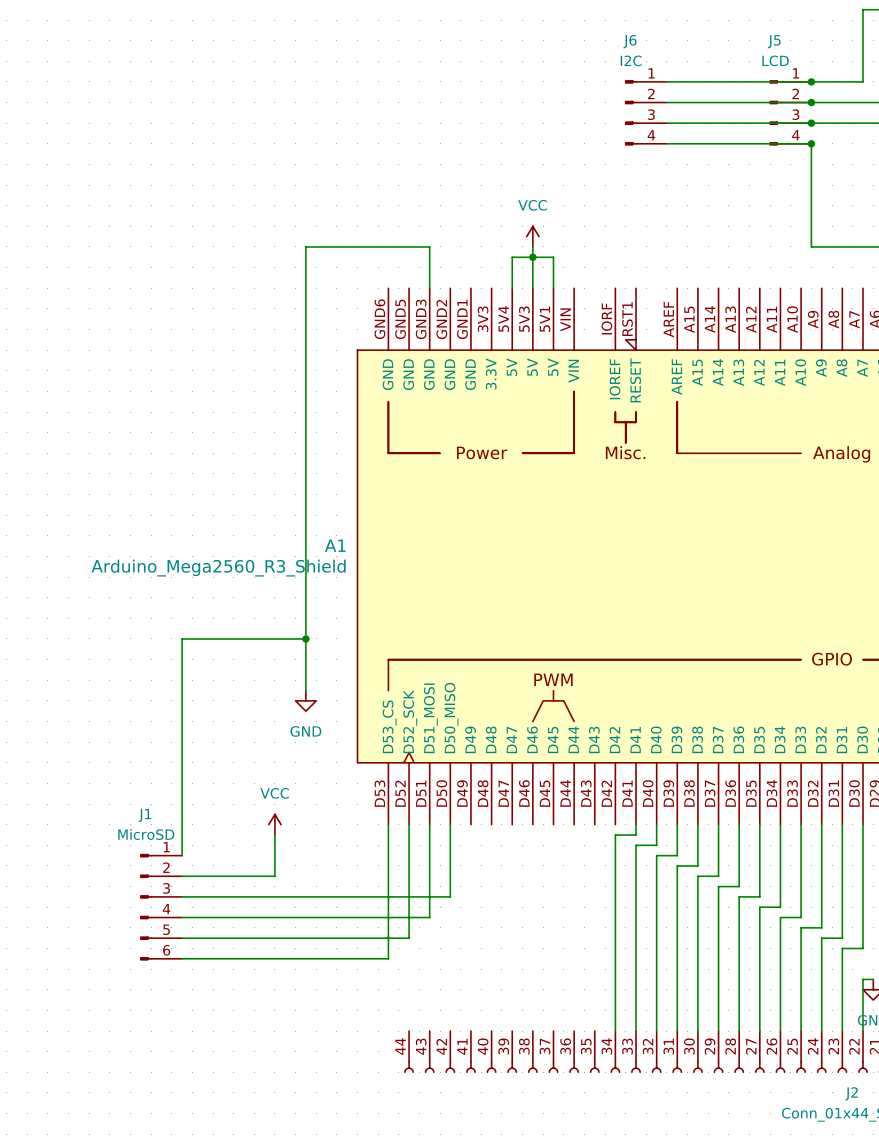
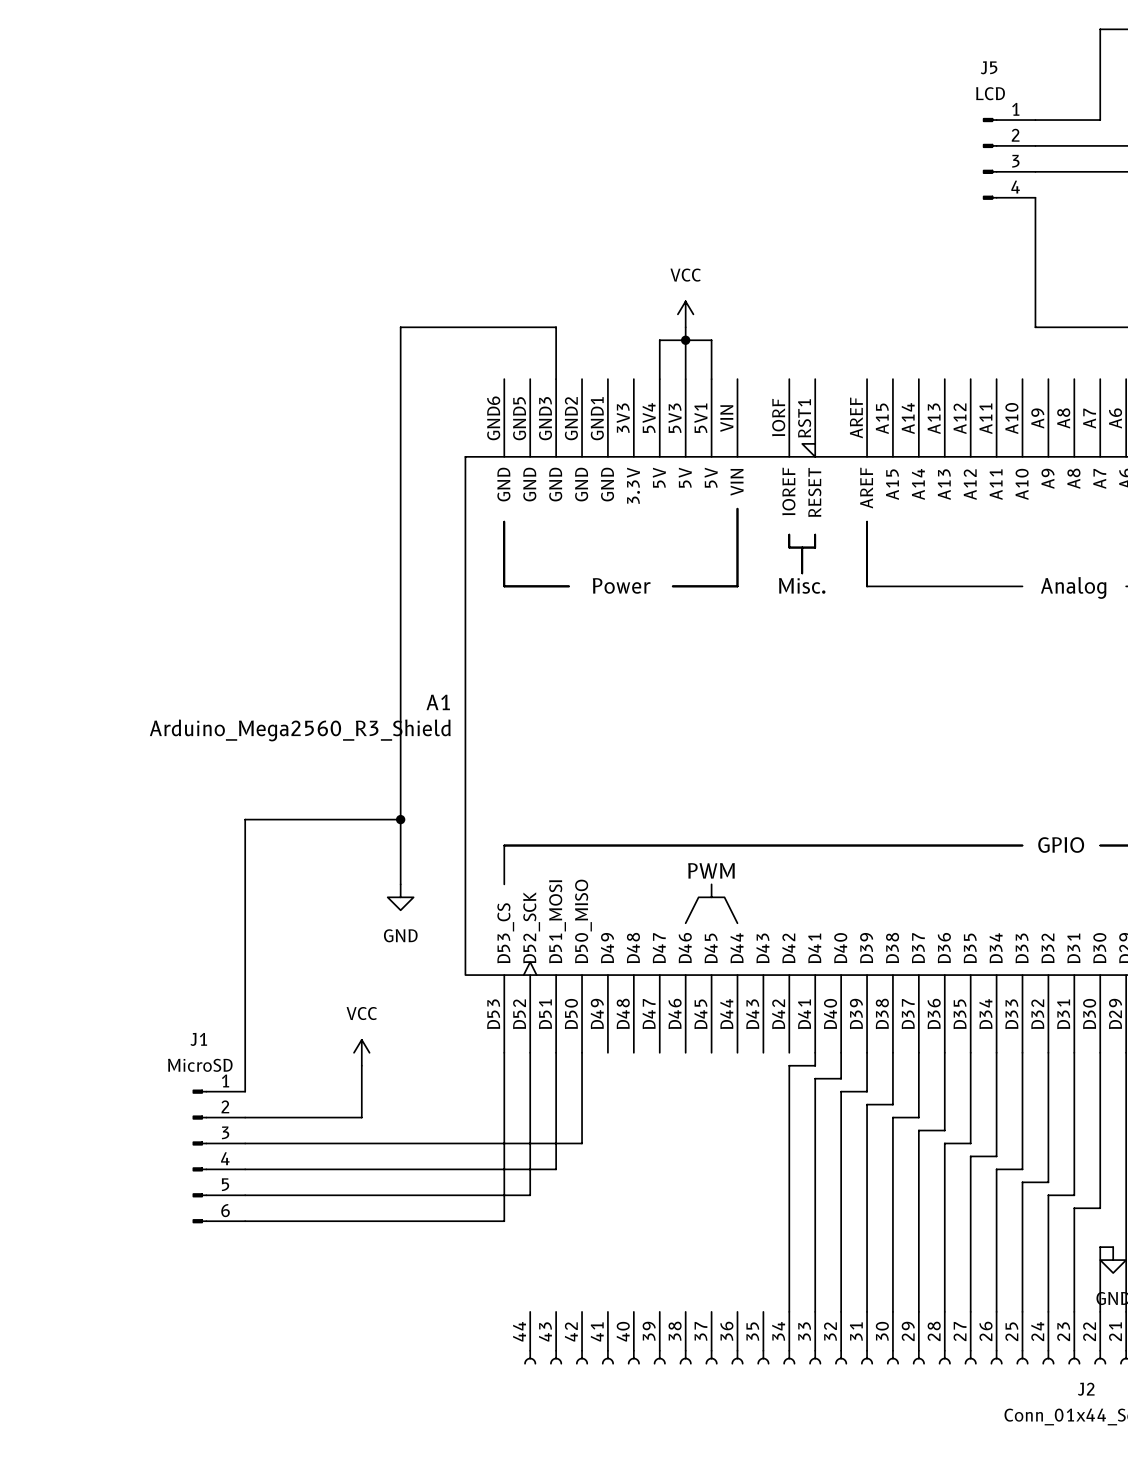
wire: (666, 81) (811, 81) -> none
junction: (811, 81) -> none
wire: (666, 102) (811, 102) -> none
junction: (811, 102) -> none
J6: I2C (646, 112) -> none
wire: (666, 123) (811, 123) -> none
junction: (811, 123) -> none
wire: (666, 143) (811, 143) -> none
junction: (811, 143) -> none

